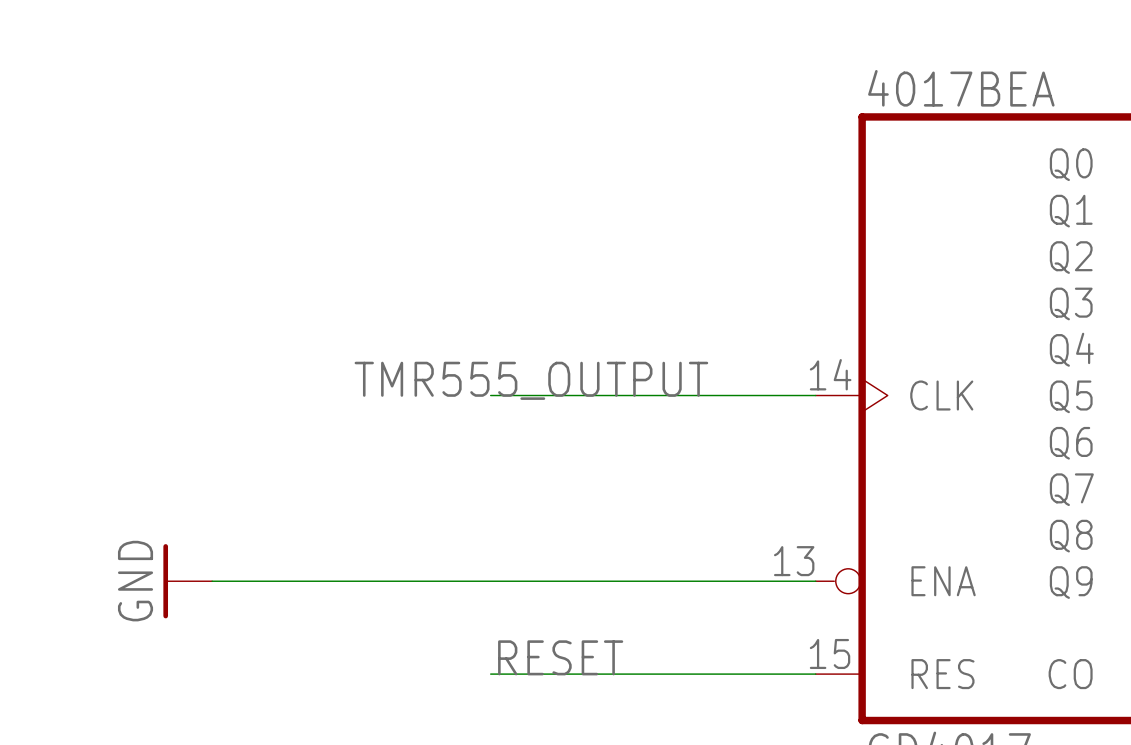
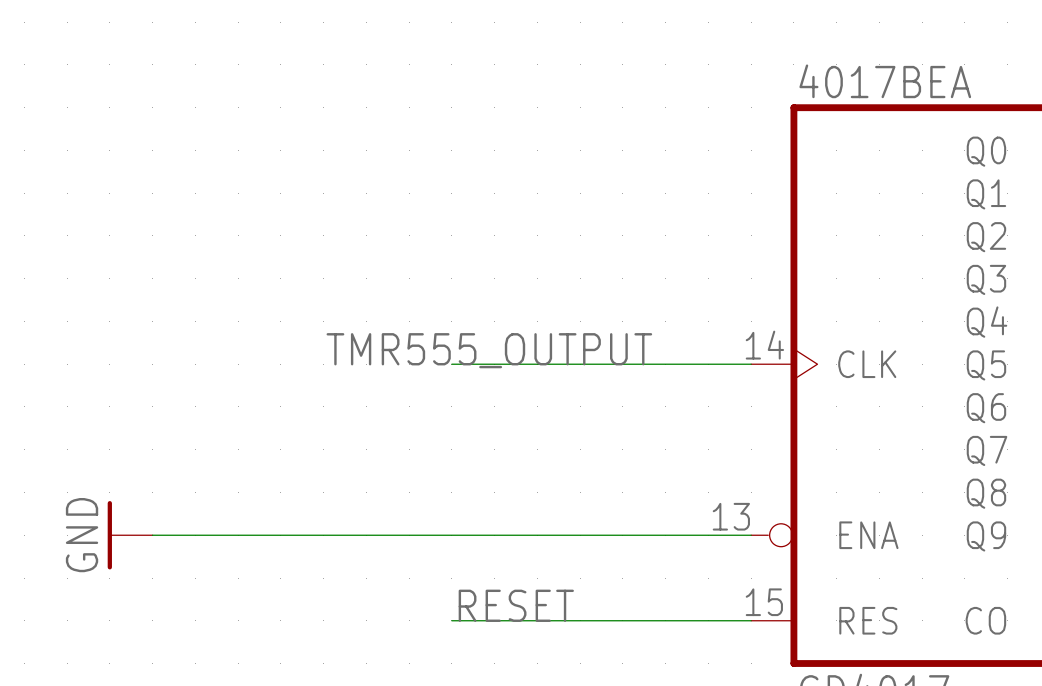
power symbol position: GND (187, 581) -> GND (130, 535)

